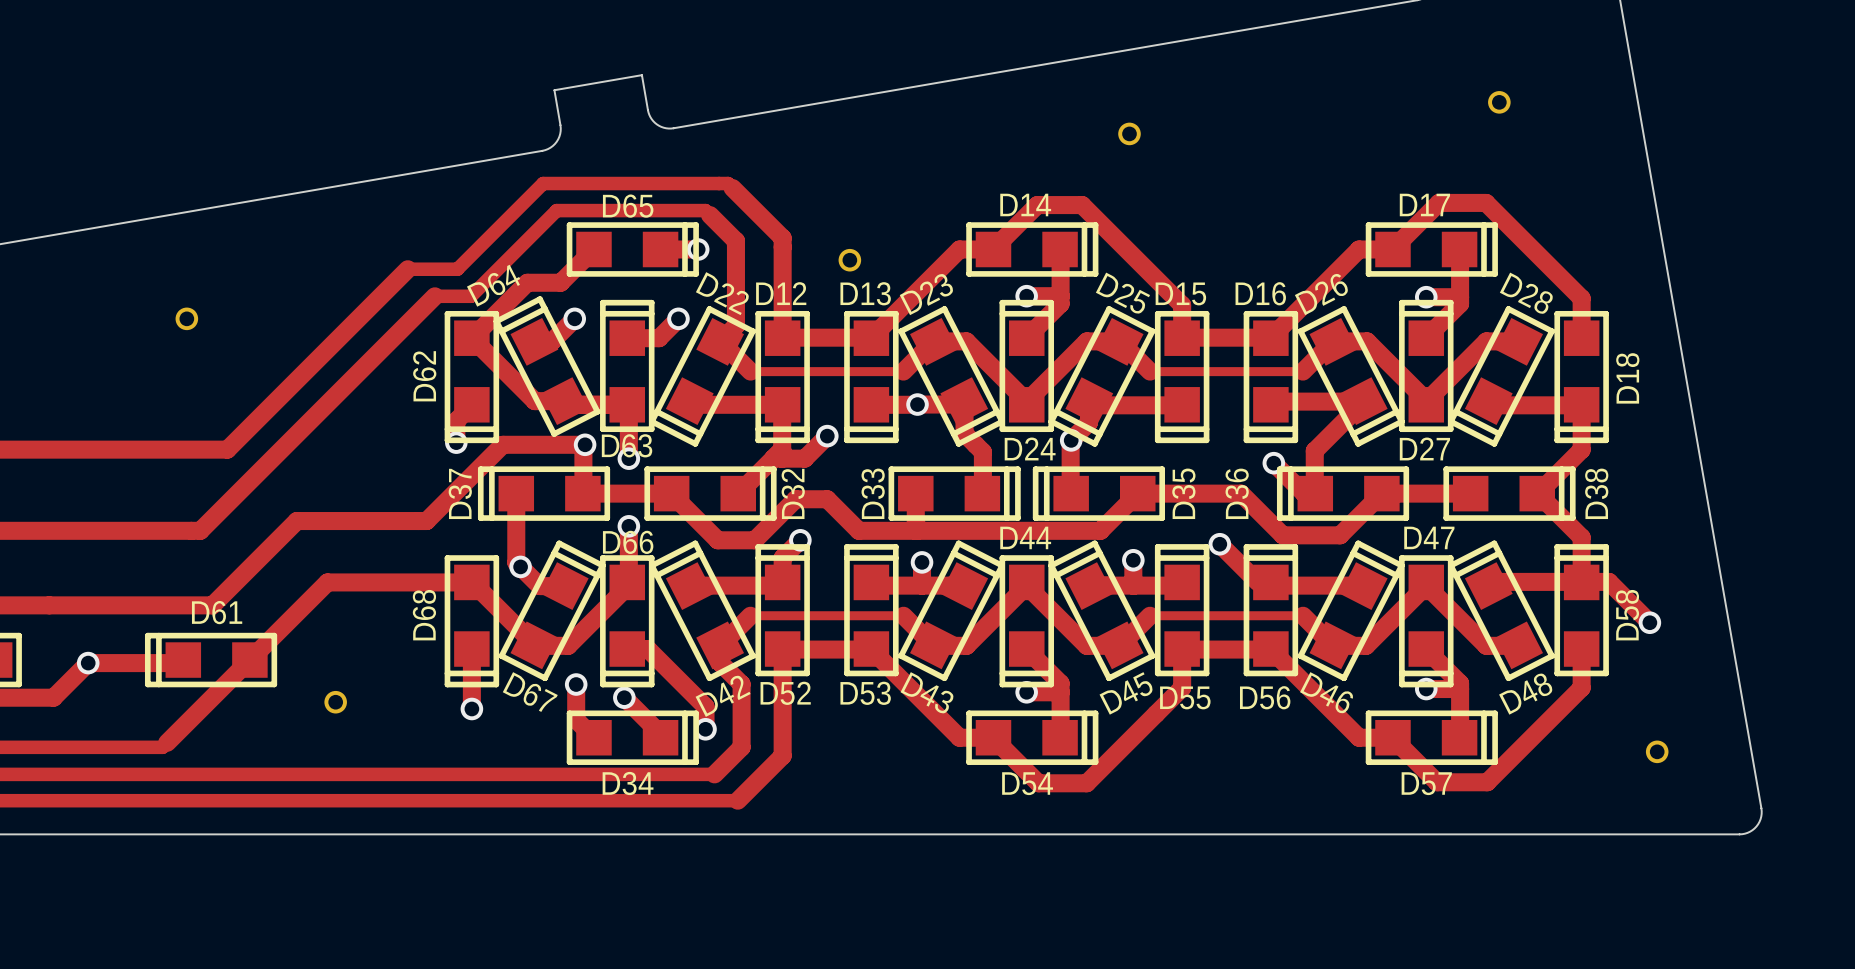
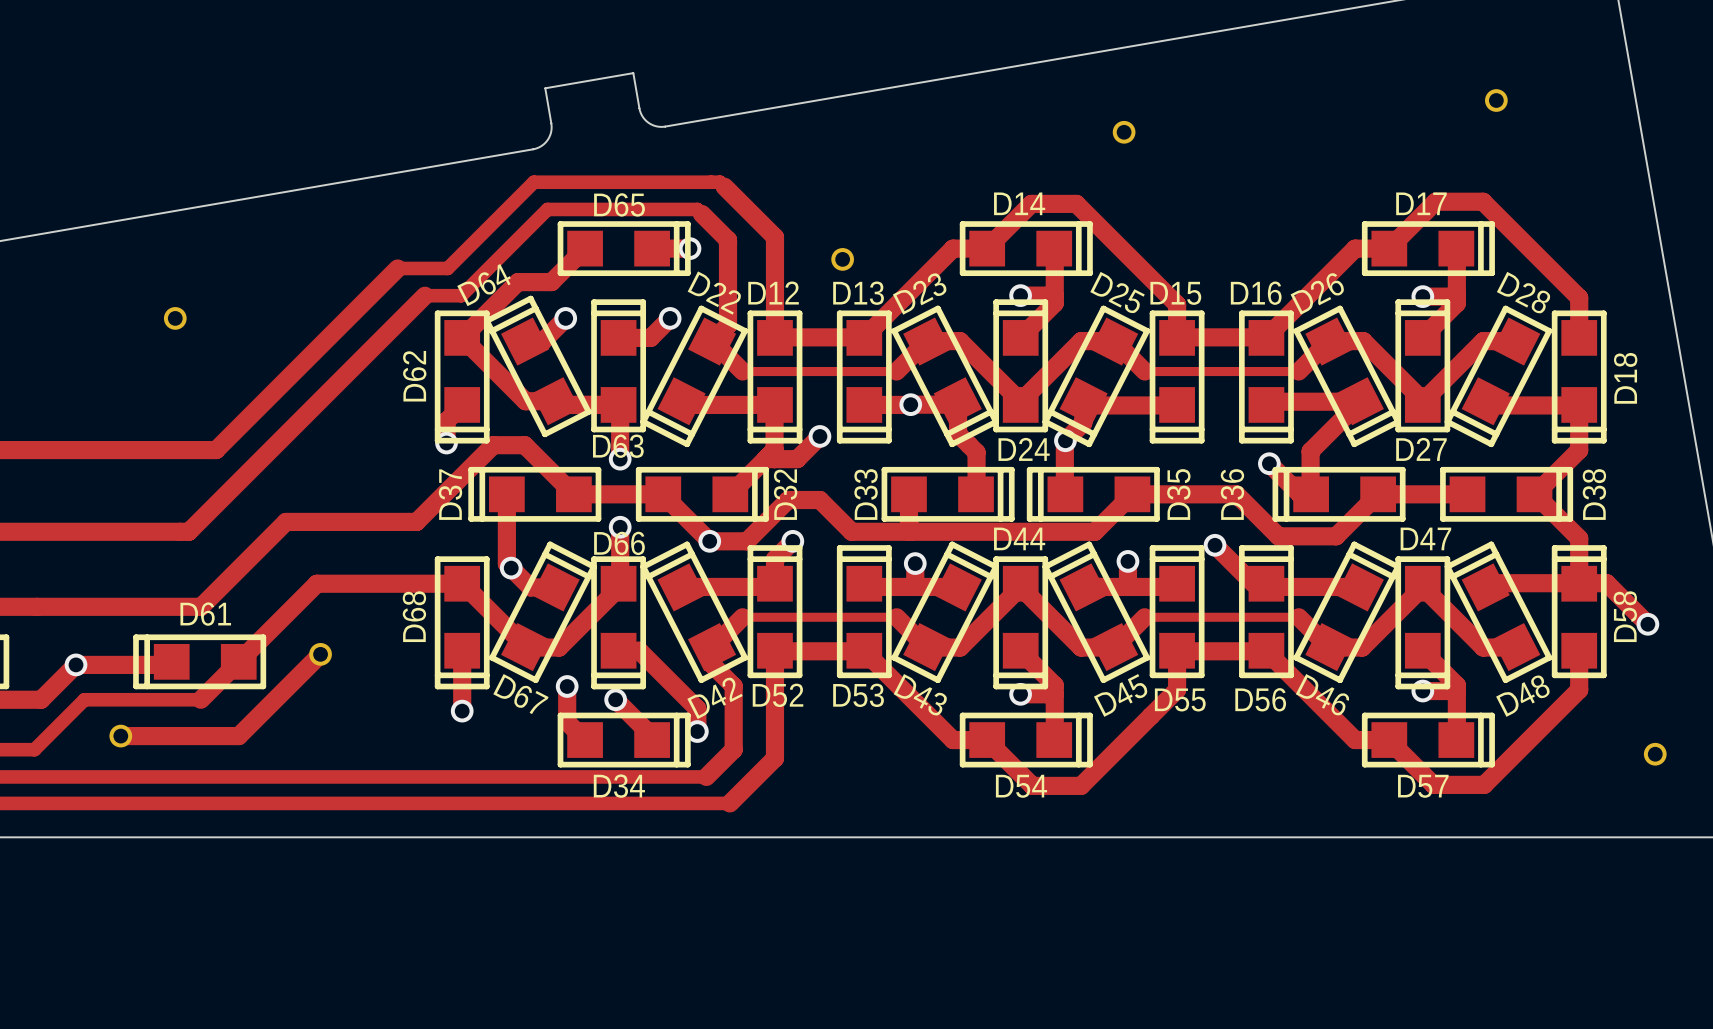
track: (534, 444) (585, 444) (583, 446) (583, 493) -> (524, 445) (573, 494)
via position: (585, 444) -> (709, 541)
track: none -> (320, 654) (238, 736) (120, 736)
track: (212, 697) (162, 747) (47, 747) -> (200, 699) (84, 699) (34, 749)
part position: (335, 702) -> (320, 654)
part: none -> (120, 736)

